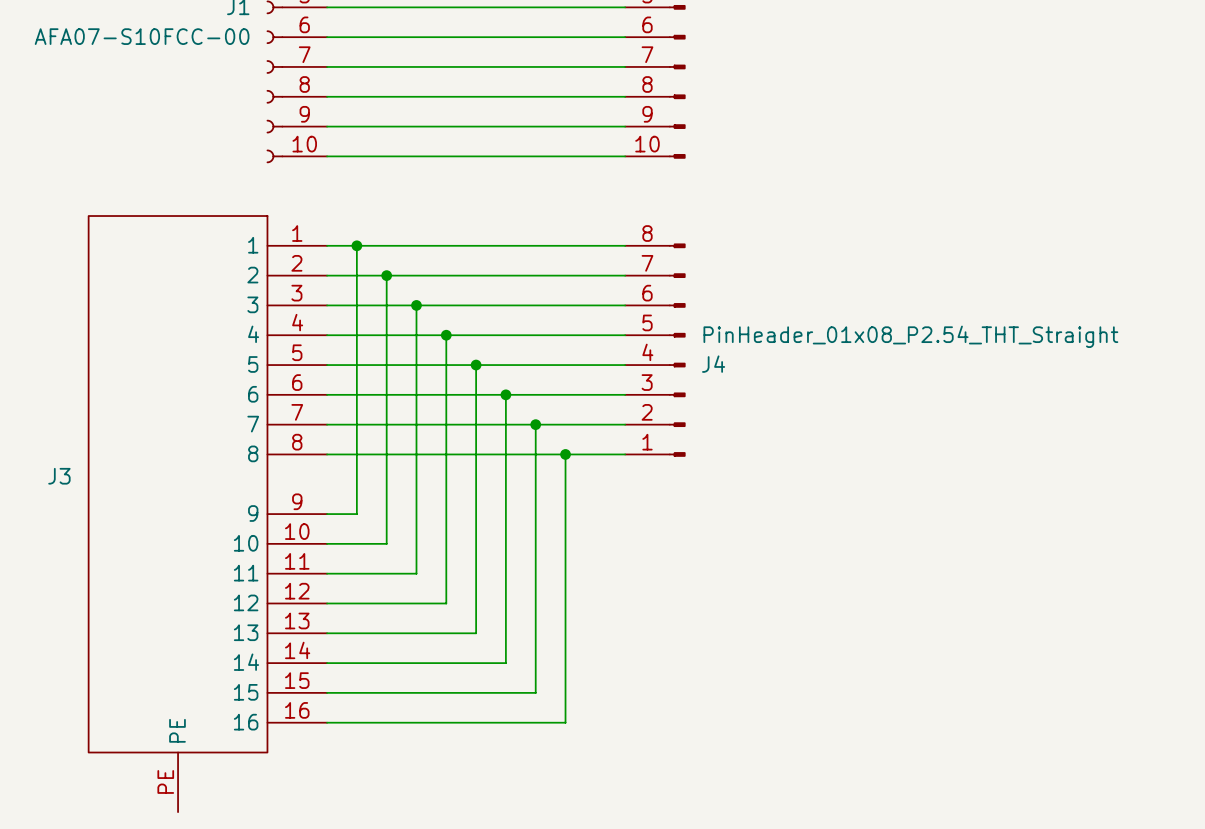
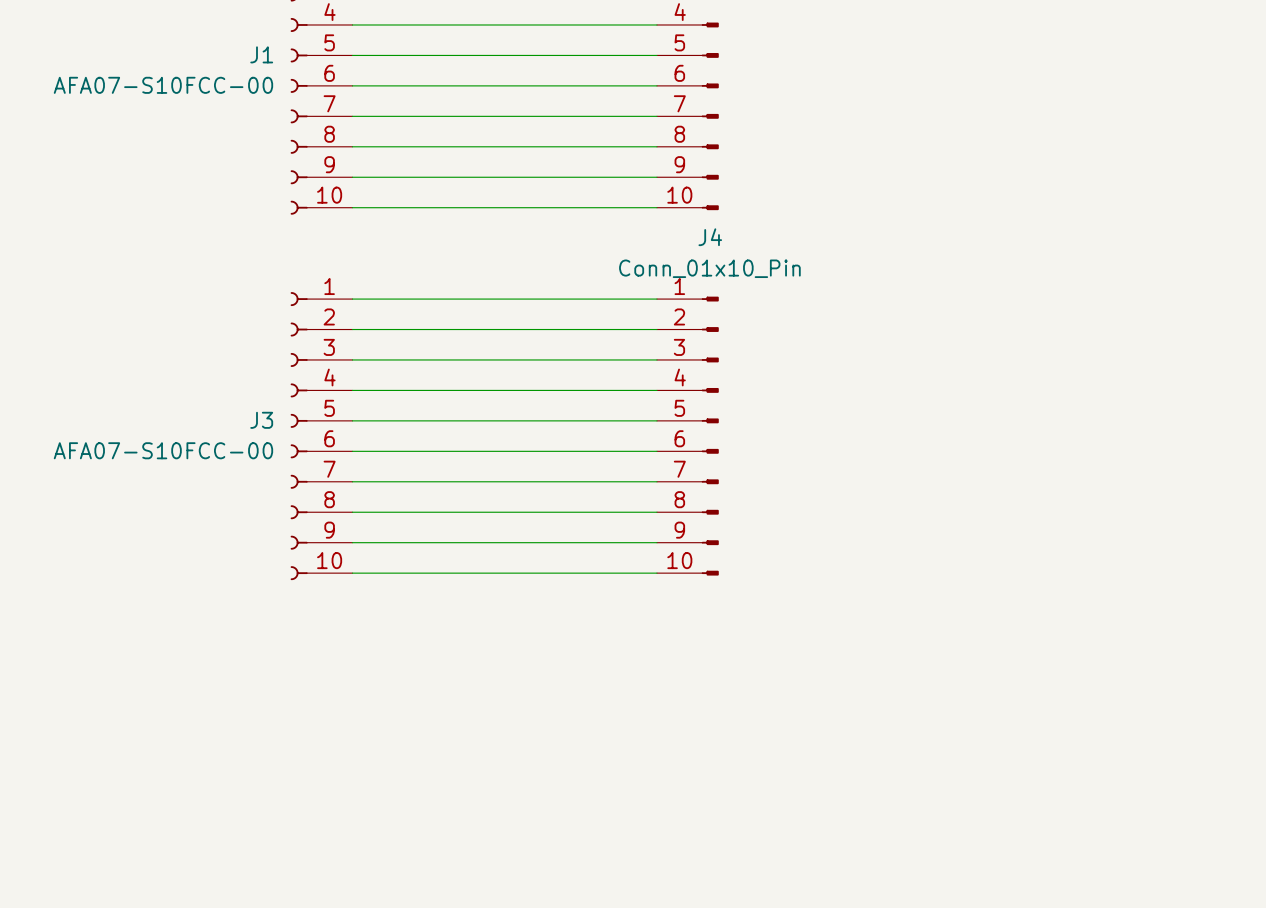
J3 symbol: [88, 216, 328, 813] -> [290, 292, 353, 581]
J4 symbol: [625, 243, 686, 457] -> [656, 296, 719, 576]
wire: (356, 245) (356, 514) -> (656, 573) (382, 573)
junction: (356, 245) -> none
wire: (386, 275) (386, 543) (327, 543) -> none
junction: (386, 275) -> none
wire: (416, 305) (416, 573) (327, 573) -> none
junction: (416, 305) -> none
wire: (446, 335) (446, 603) (327, 603) -> none
junction: (446, 335) -> none
J4 value: PinHeader_01x08_P2.54_THT_Straight (910, 336) -> Conn_01x10_Pin (709, 268)
J4 name position: J4 (713, 364) -> J4 (710, 237)
wire: (476, 365) (476, 633) (327, 633) -> none
junction: (476, 365) -> none
J3 value: none -> AFA07-S10FCC-00 (163, 450)
wire: (505, 394) (505, 663) (327, 663) -> none
junction: (505, 394) -> none
wire: (535, 424) (535, 692) (327, 692) -> none
junction: (535, 424) -> none
wire: (565, 454) (565, 722) (327, 722) -> none
junction: (565, 454) -> none
J3 name position: J3 (59, 476) -> J3 (261, 420)
wire: none -> (352, 542) (656, 542)

